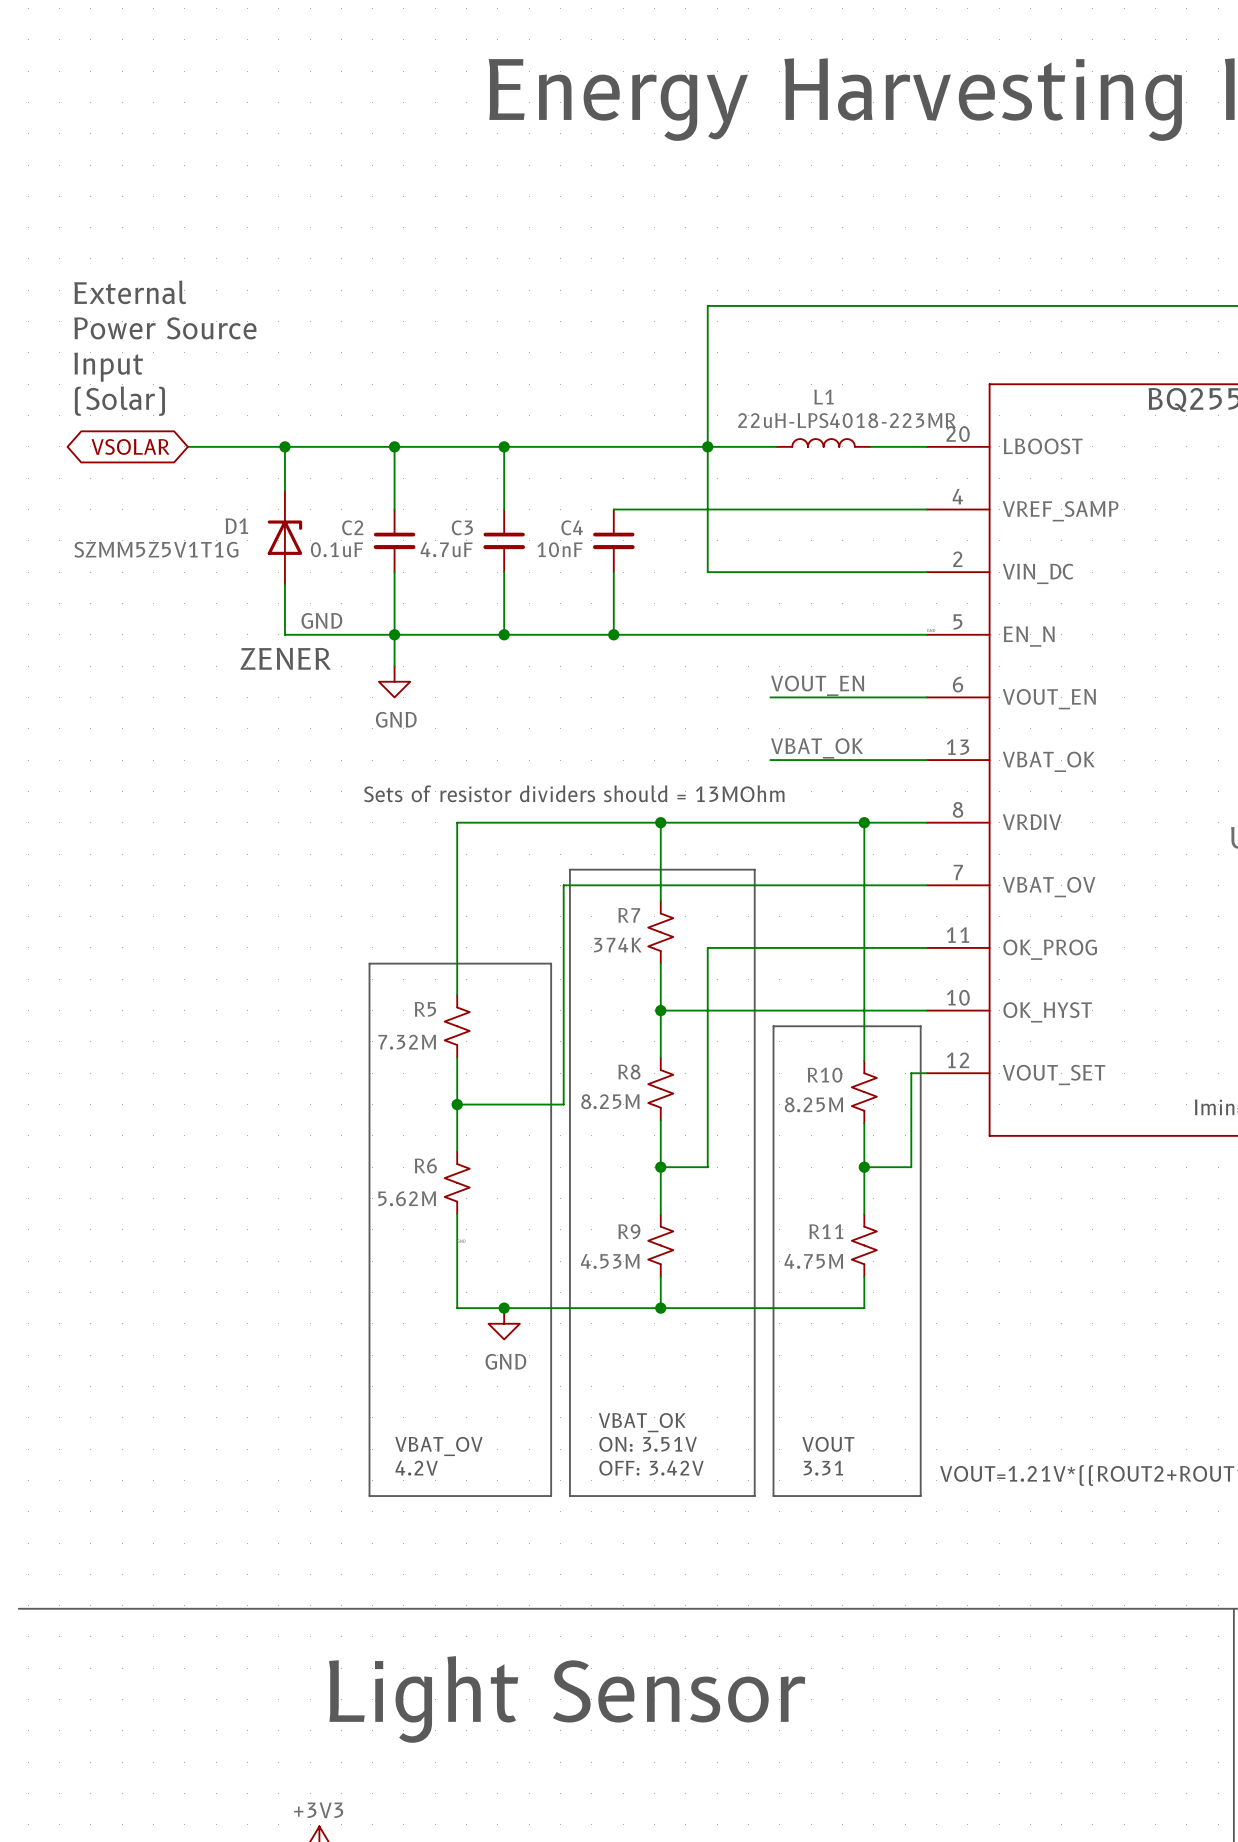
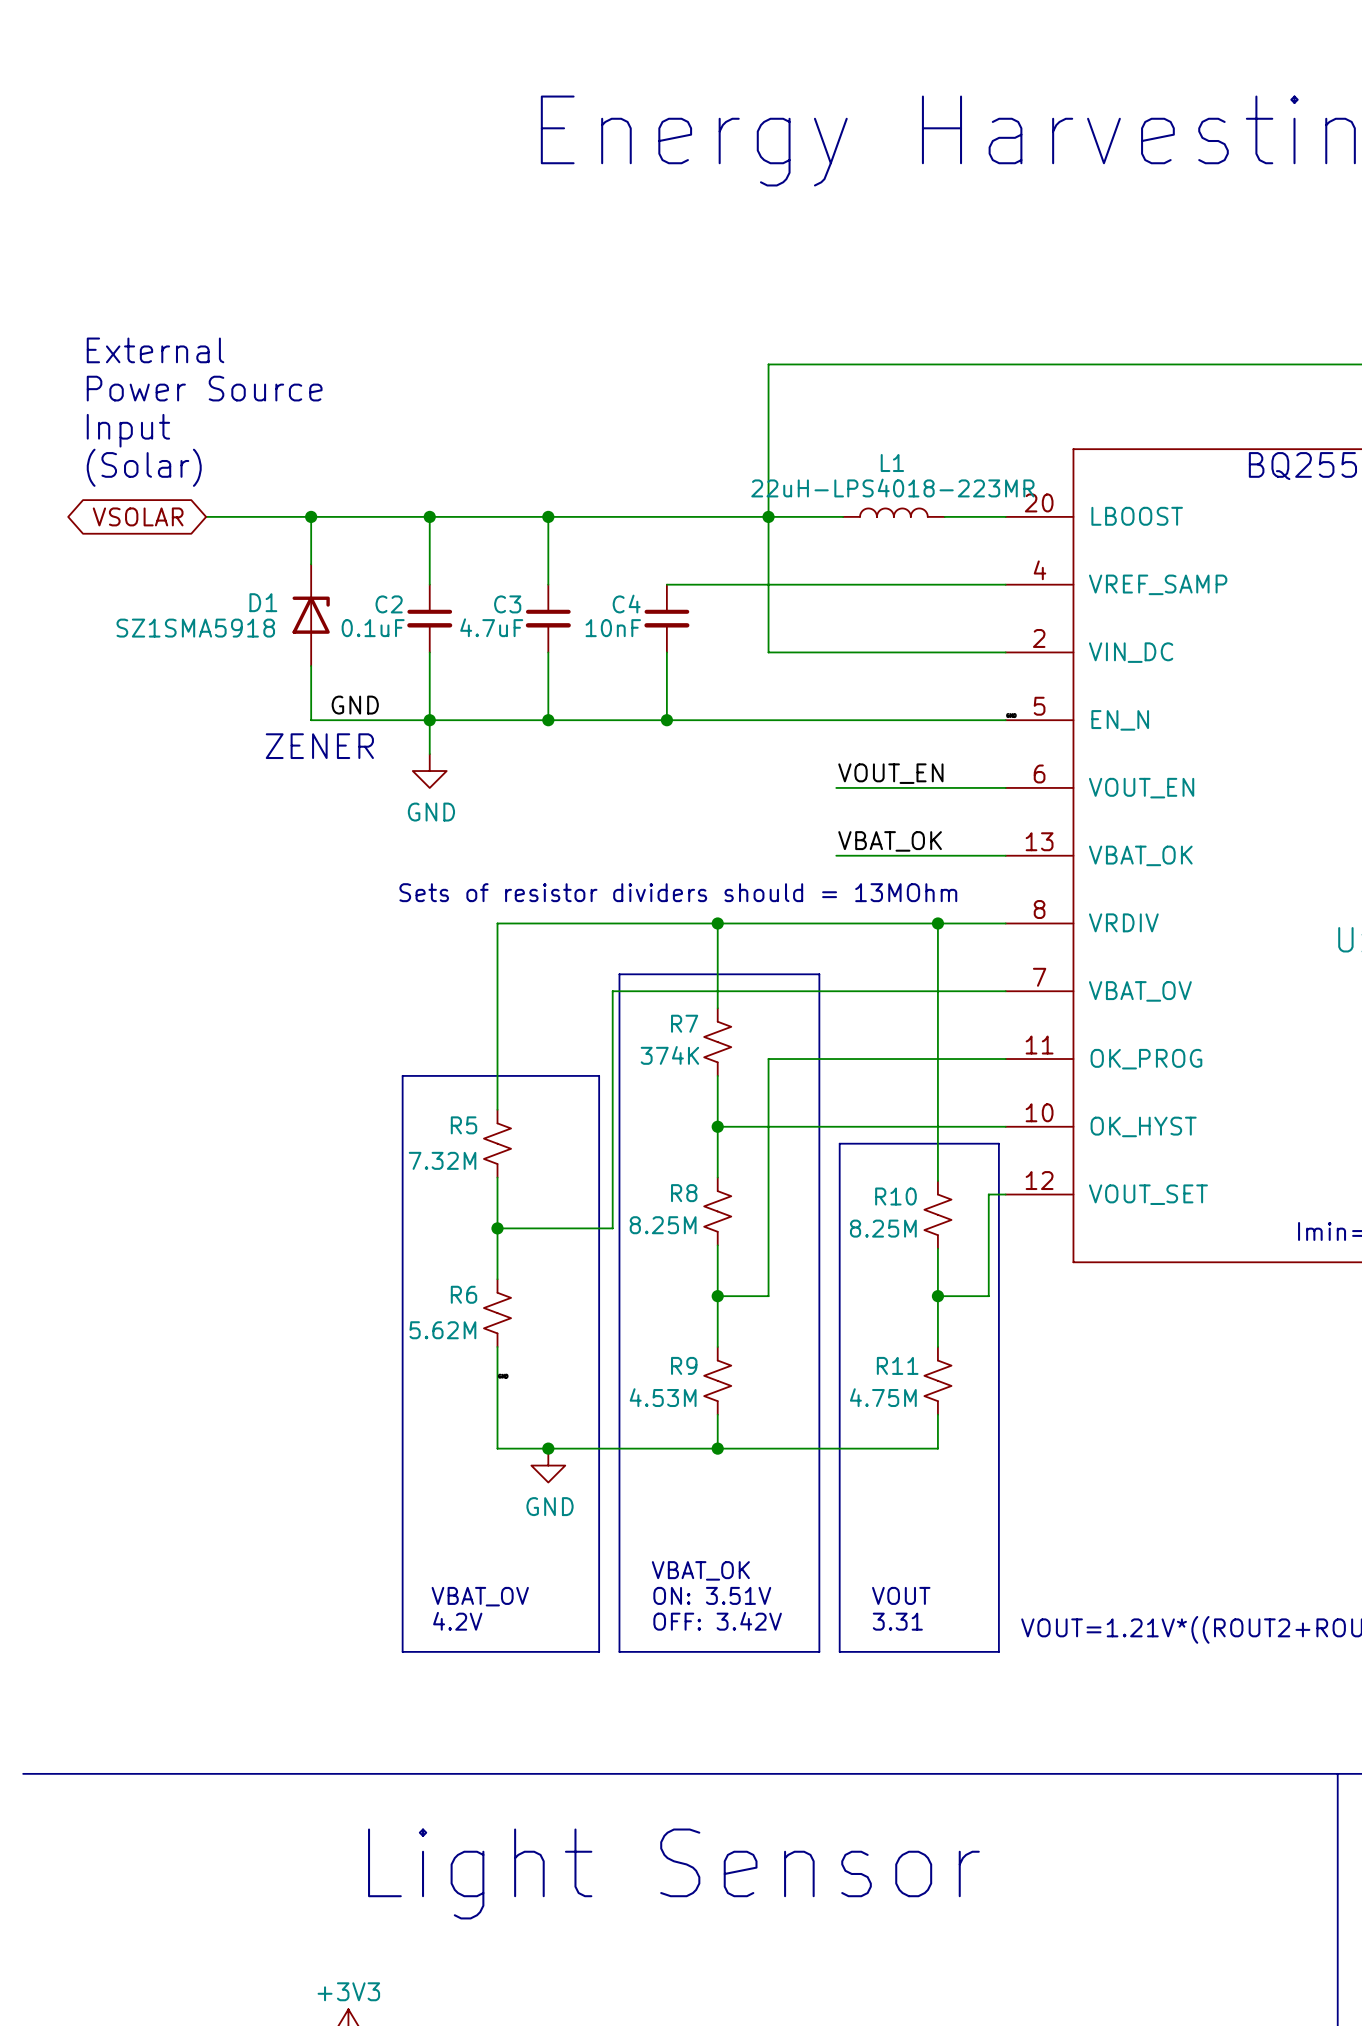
D1 value: SZMM5Z5V1T1G (156, 549) -> SZ1SMA5918 (195, 628)

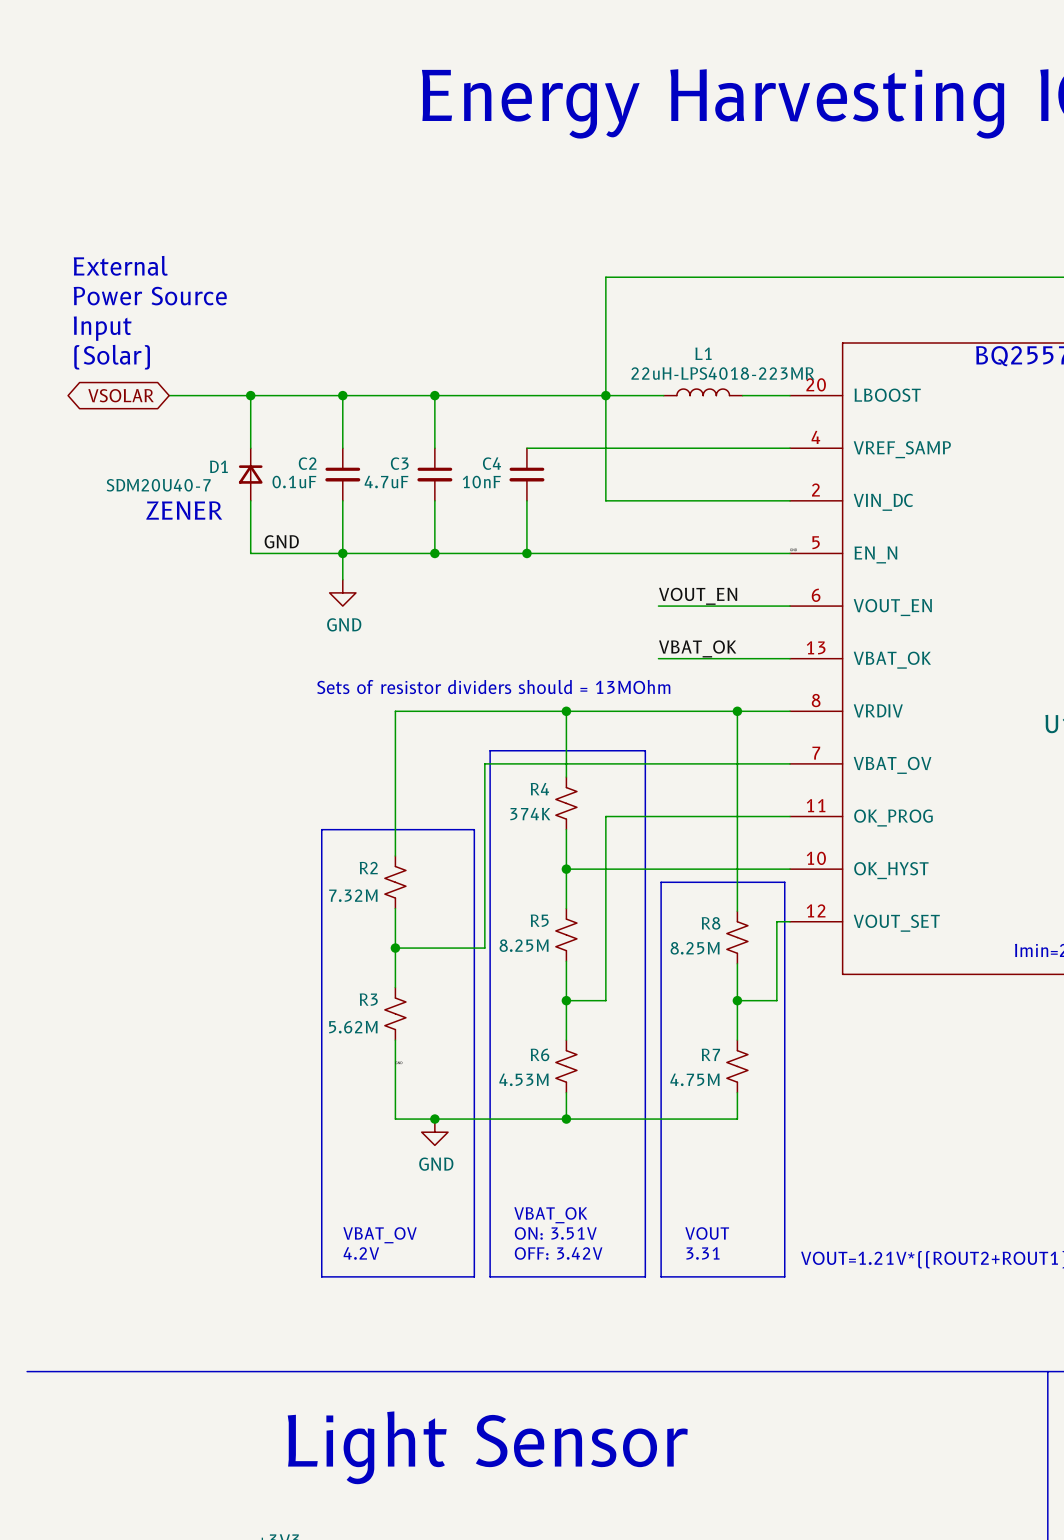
D1 symbol: [292, 564, 330, 666] -> [238, 448, 263, 501]
D1 value: SZ1SMA5918 (195, 628) -> SDM20U40-7 (158, 485)
text position: ZENER (319, 746) -> ZENER (184, 510)
R7 name: R7 (684, 1023) -> R4 (539, 789)
R5 name: R5 (464, 1125) -> R2 (368, 868)
R8 name: R8 (684, 1193) -> R5 (539, 920)
R10 name: R10 (895, 1196) -> R8 (711, 923)
R6 name: R6 (464, 1294) -> R3 (368, 999)
R9 name: R9 (684, 1365) -> R6 (540, 1054)
R11 name: R11 (897, 1365) -> R7 (710, 1054)

